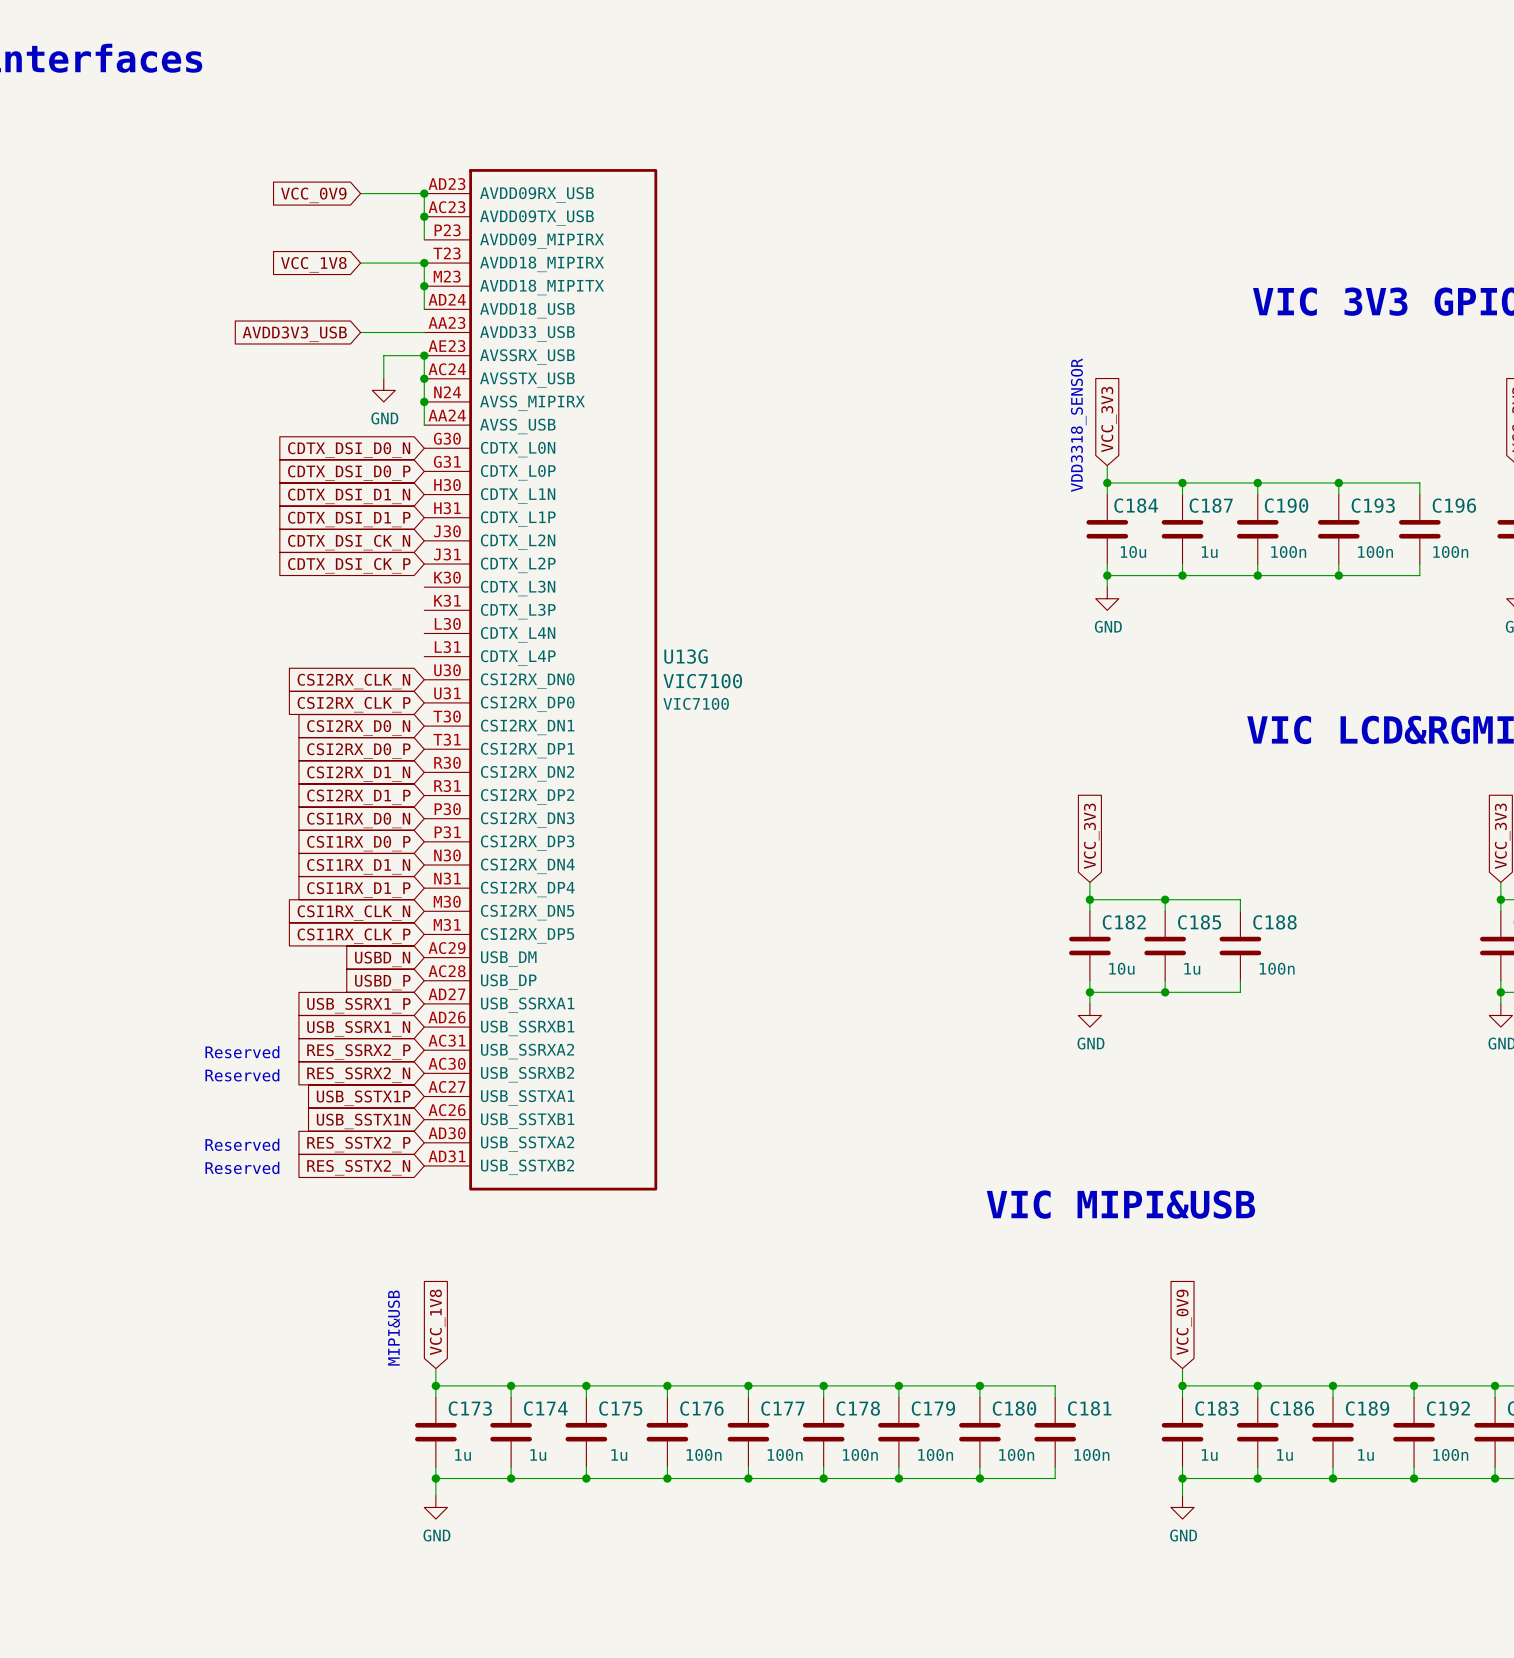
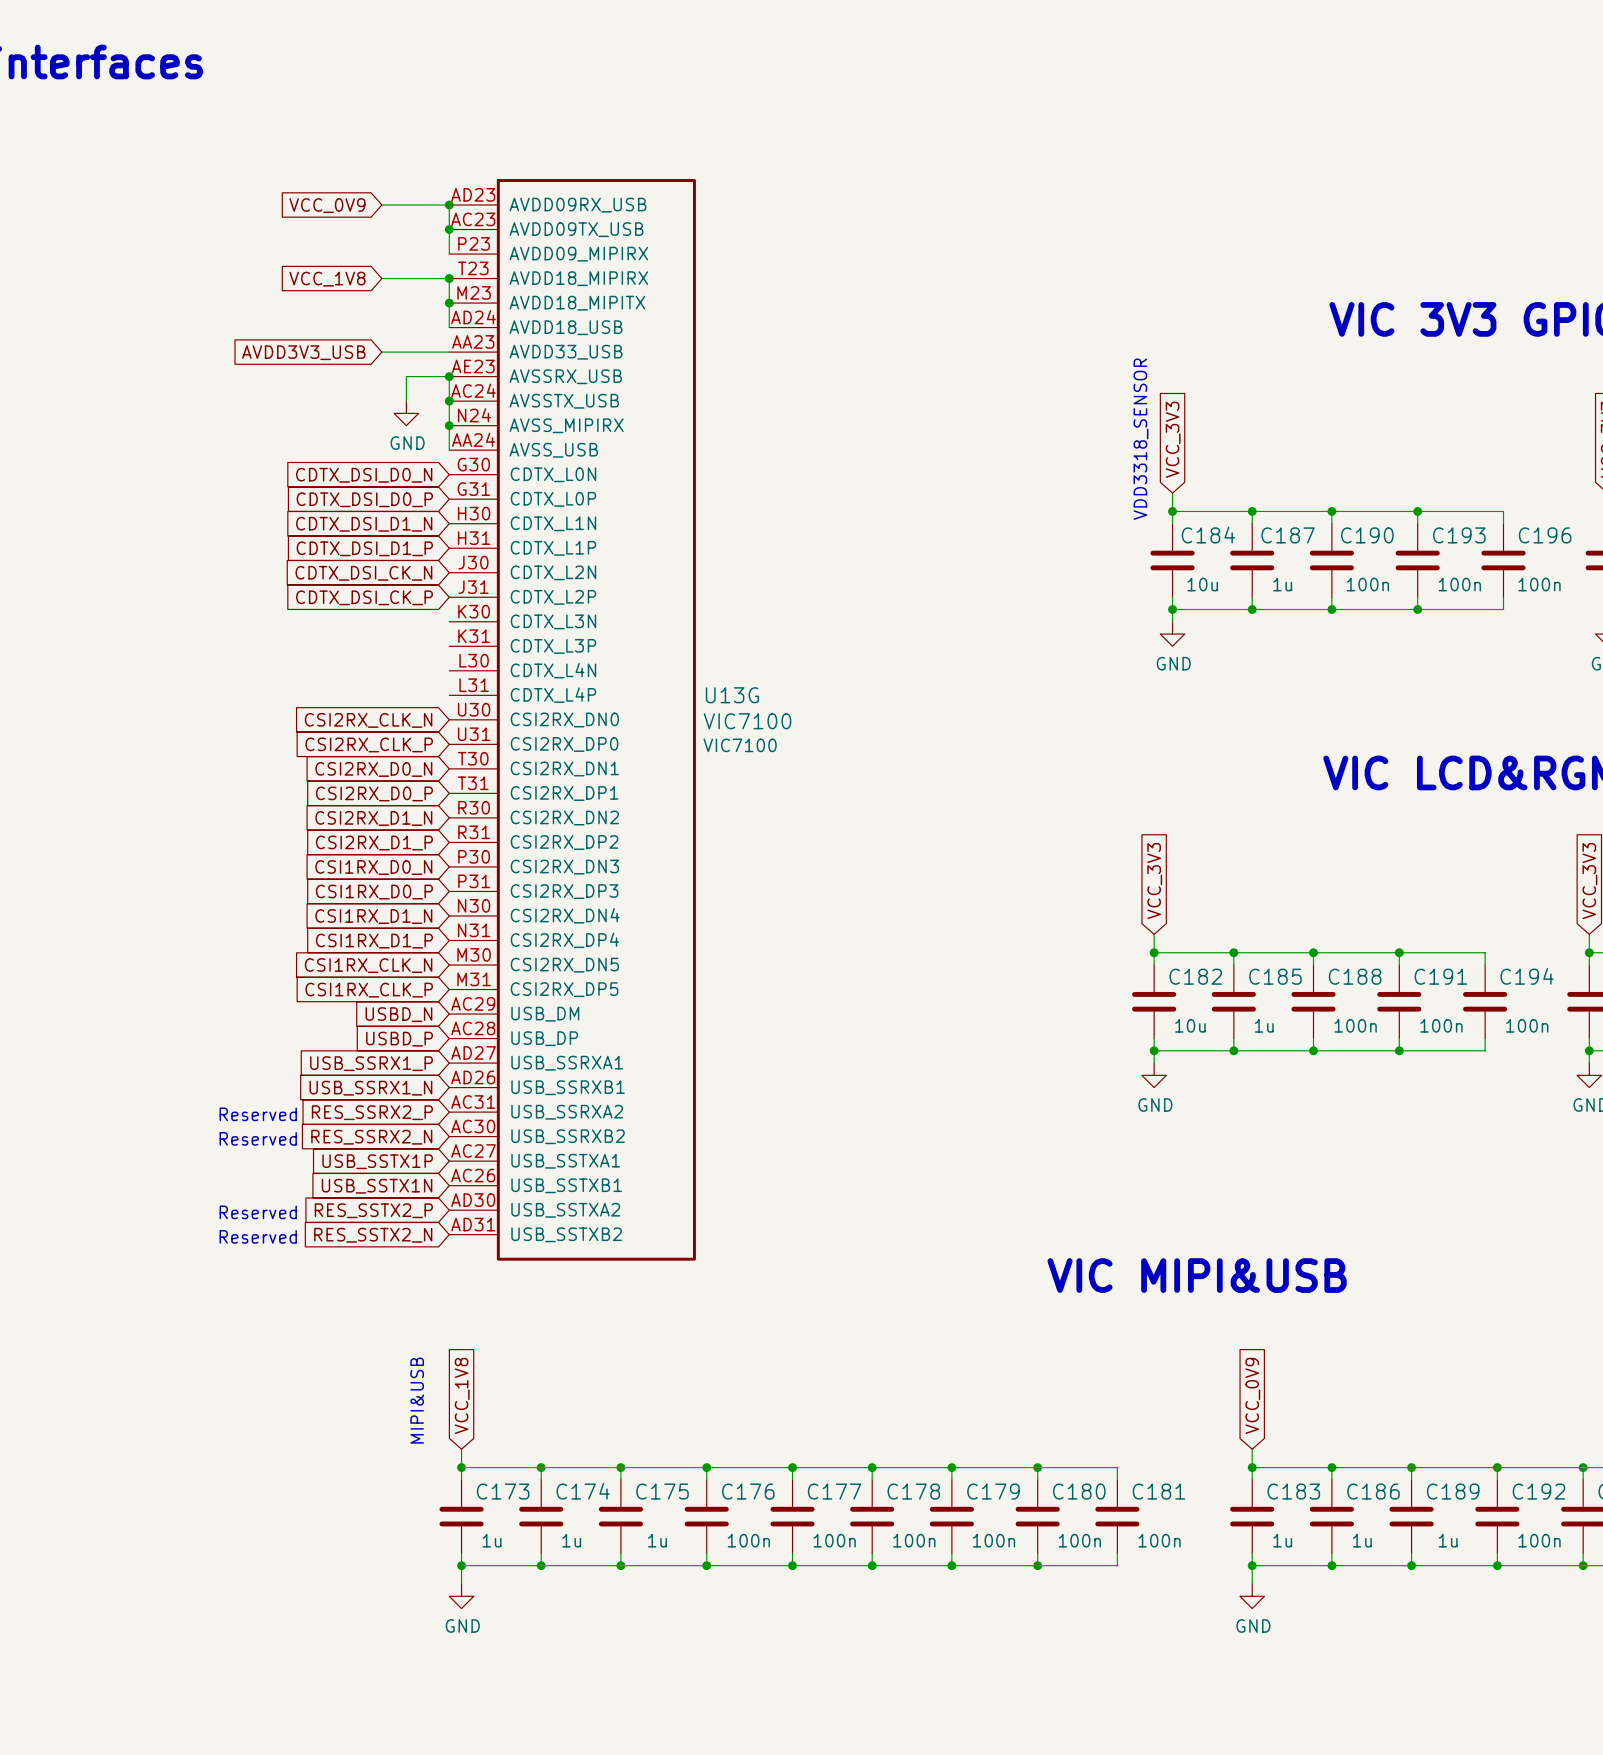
wire: none -> (1313, 952) (1485, 952) (1485, 965)
junction: none -> (1313, 952)
wire: none -> (1399, 952) (1399, 965)
junction: none -> (1399, 952)
C191: none -> (1399, 1001)
C194: none -> (1485, 1001)
wire: none -> (1399, 1038) (1399, 1050)
wire: none -> (1485, 1038) (1485, 1050) (1313, 1050)
junction: none -> (1313, 1050)
junction: none -> (1399, 1050)

